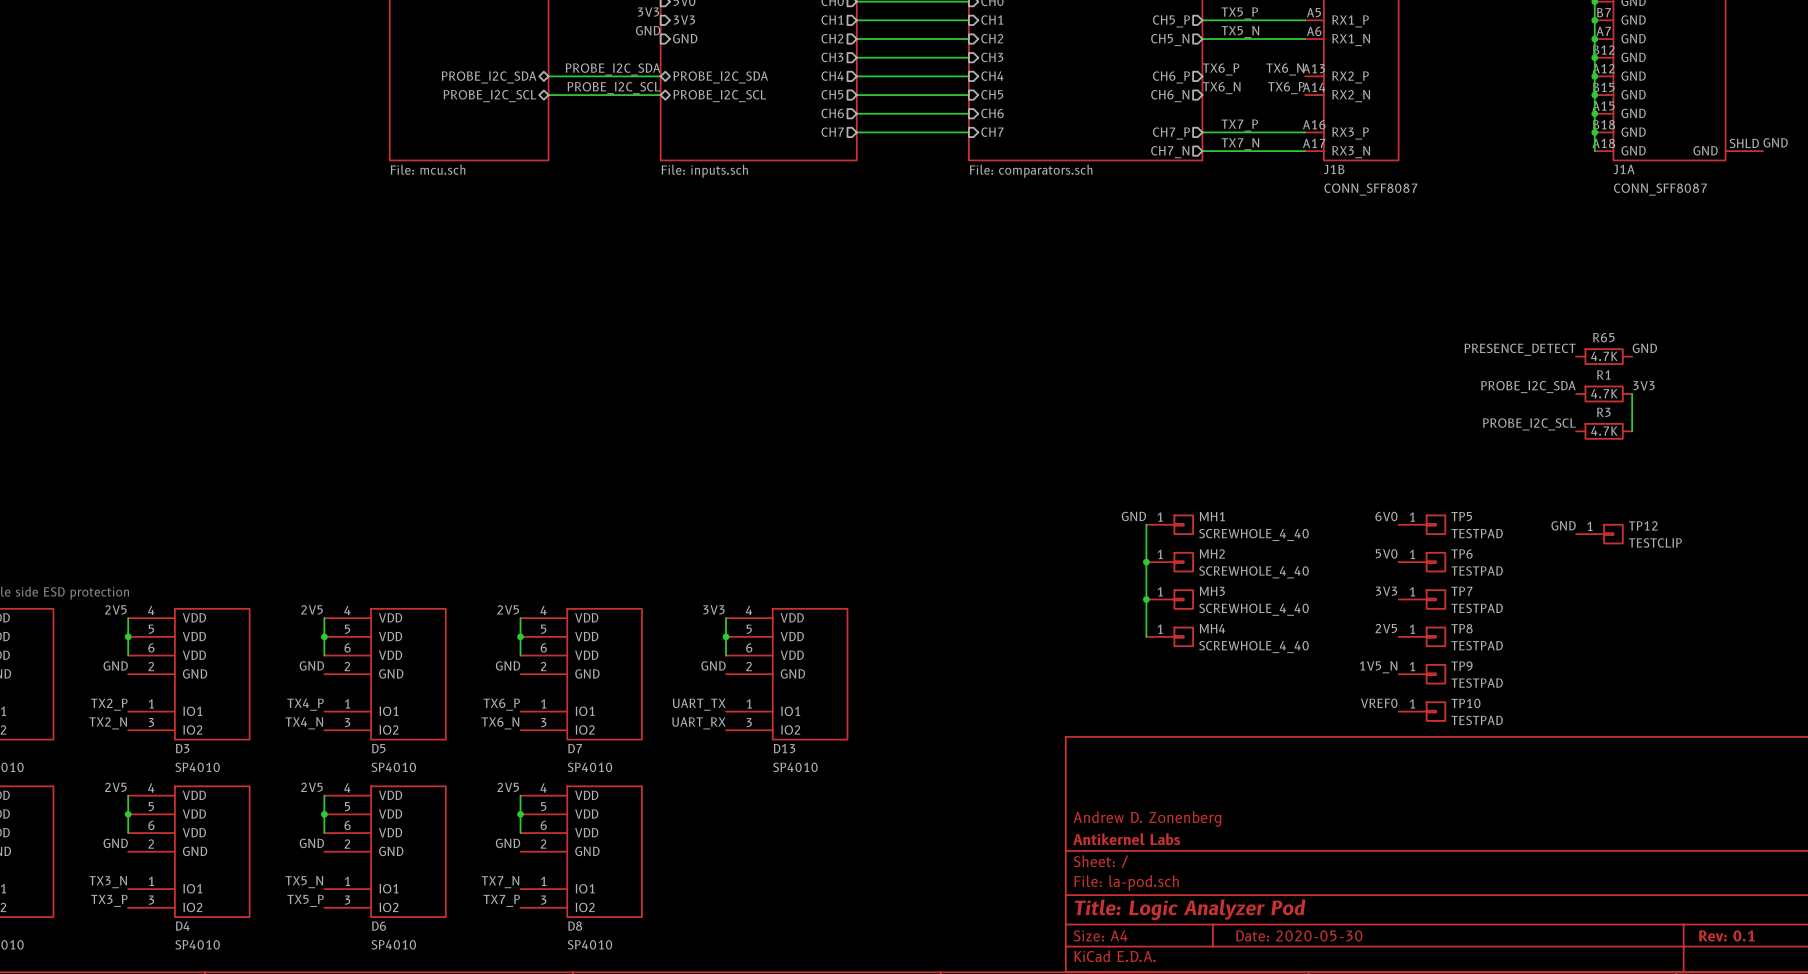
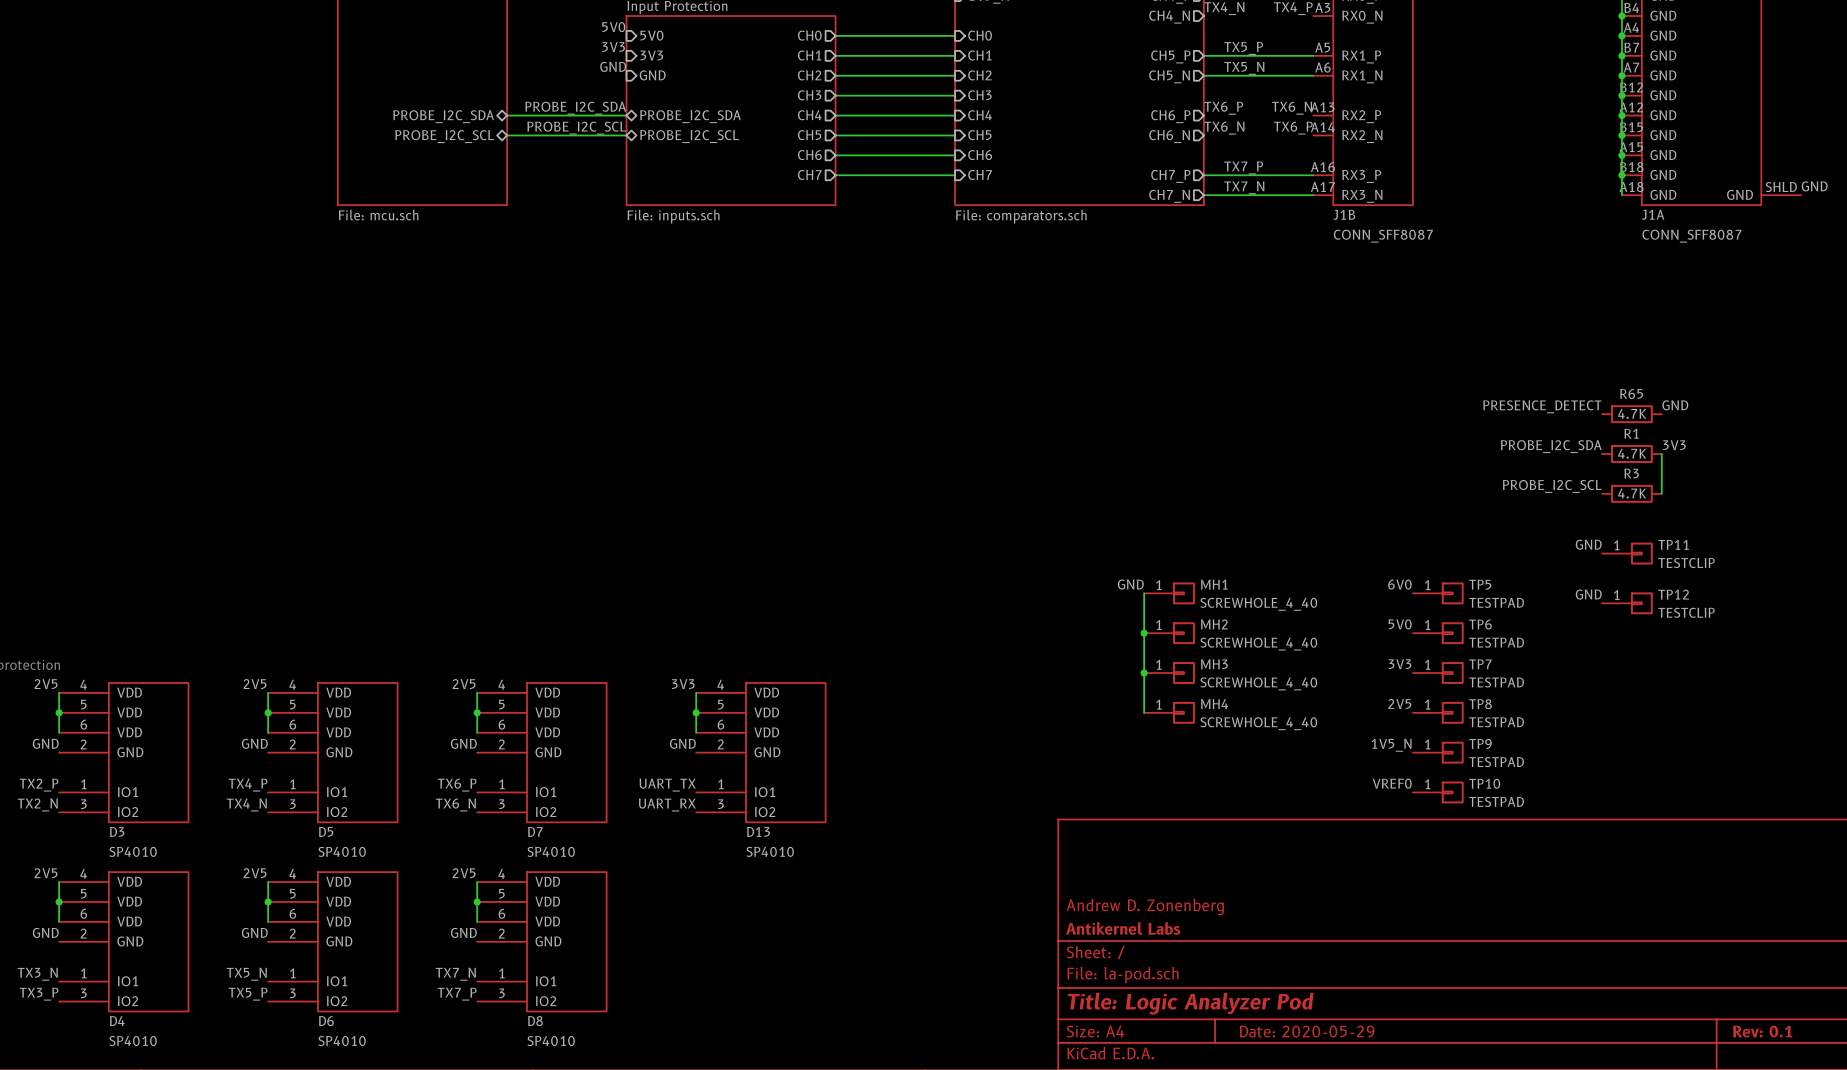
label: none -> GND (1588, 544)
TP11: none -> TESTCLIP (1627, 553)
title block: Date: 2020-05-30 (1299, 935) -> Date: 2020-05-29 (1307, 1031)

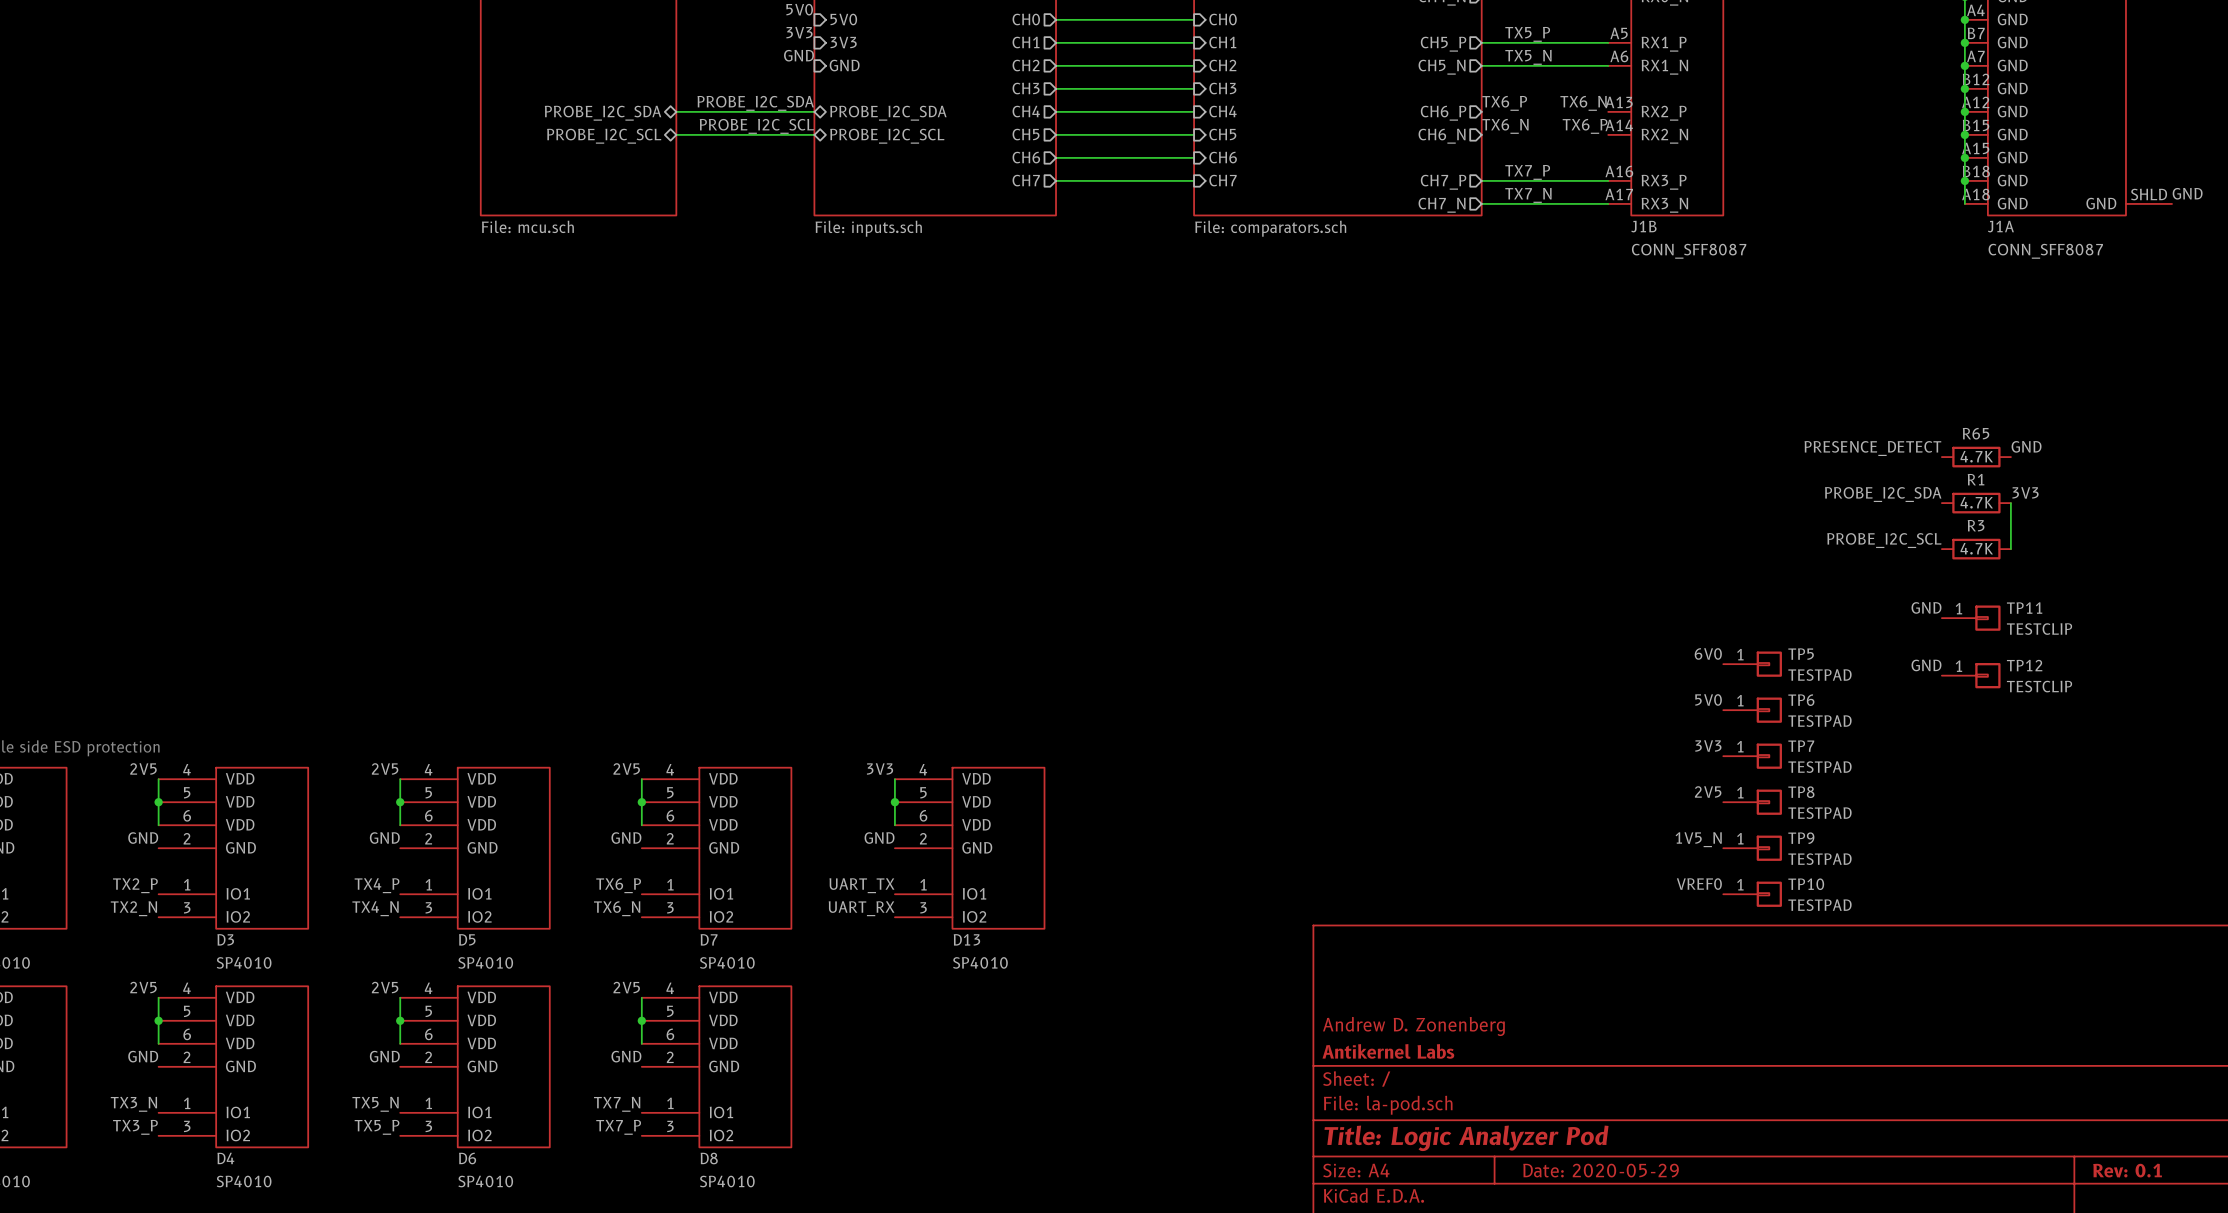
label: GND (1130, 584) -> none
wire: (1144, 593) (1144, 712) -> none
MH1: SCREWHOLE_4_40 (1169, 593) -> none
junction: (1144, 633) -> none
MH2: SCREWHOLE_4_40 (1169, 633) -> none
junction: (1144, 673) -> none
MH3: SCREWHOLE_4_40 (1169, 673) -> none
MH4: SCREWHOLE_4_40 (1169, 712) -> none

